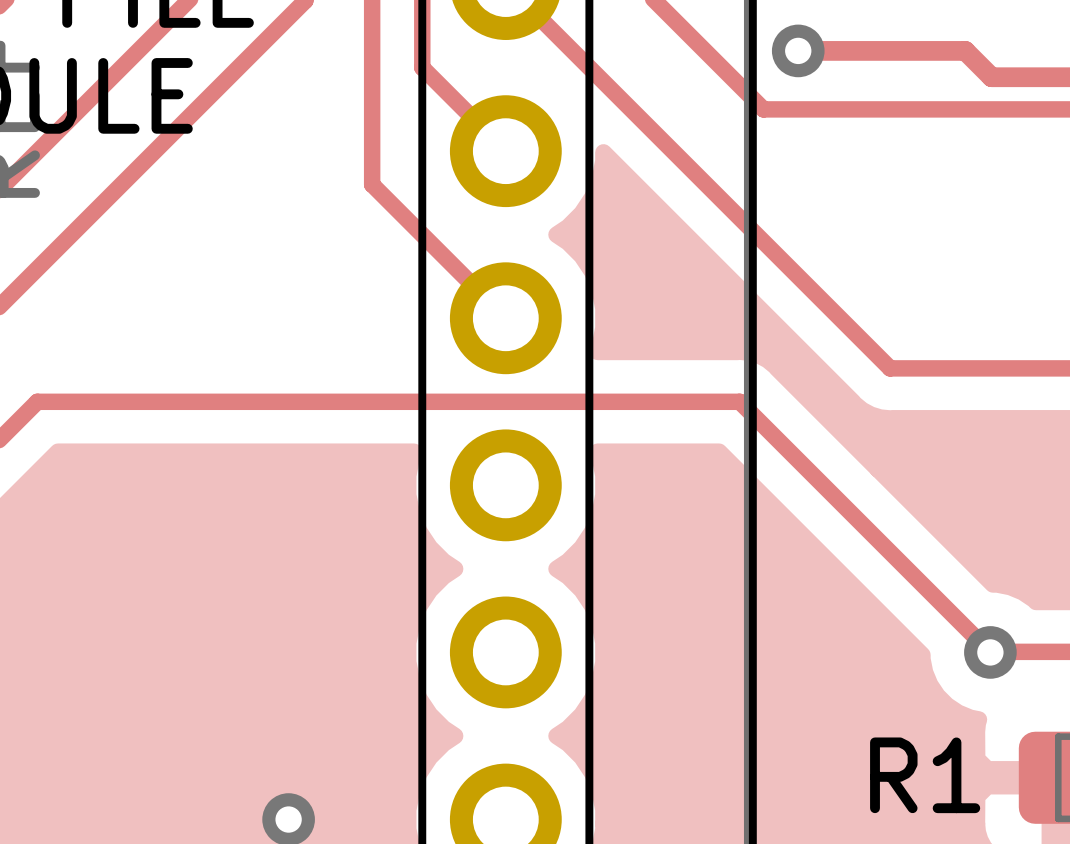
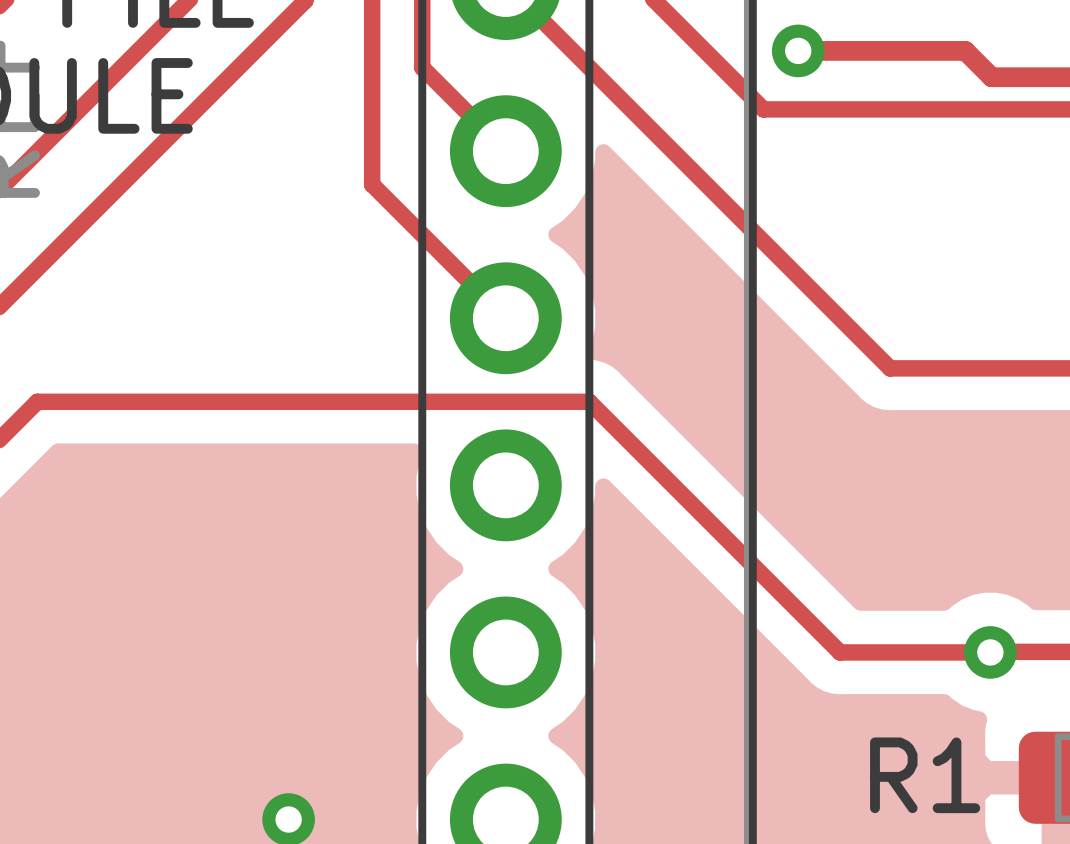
track: (589, 401) (739, 401) (990, 652) -> (589, 401) (840, 652) (990, 652)

